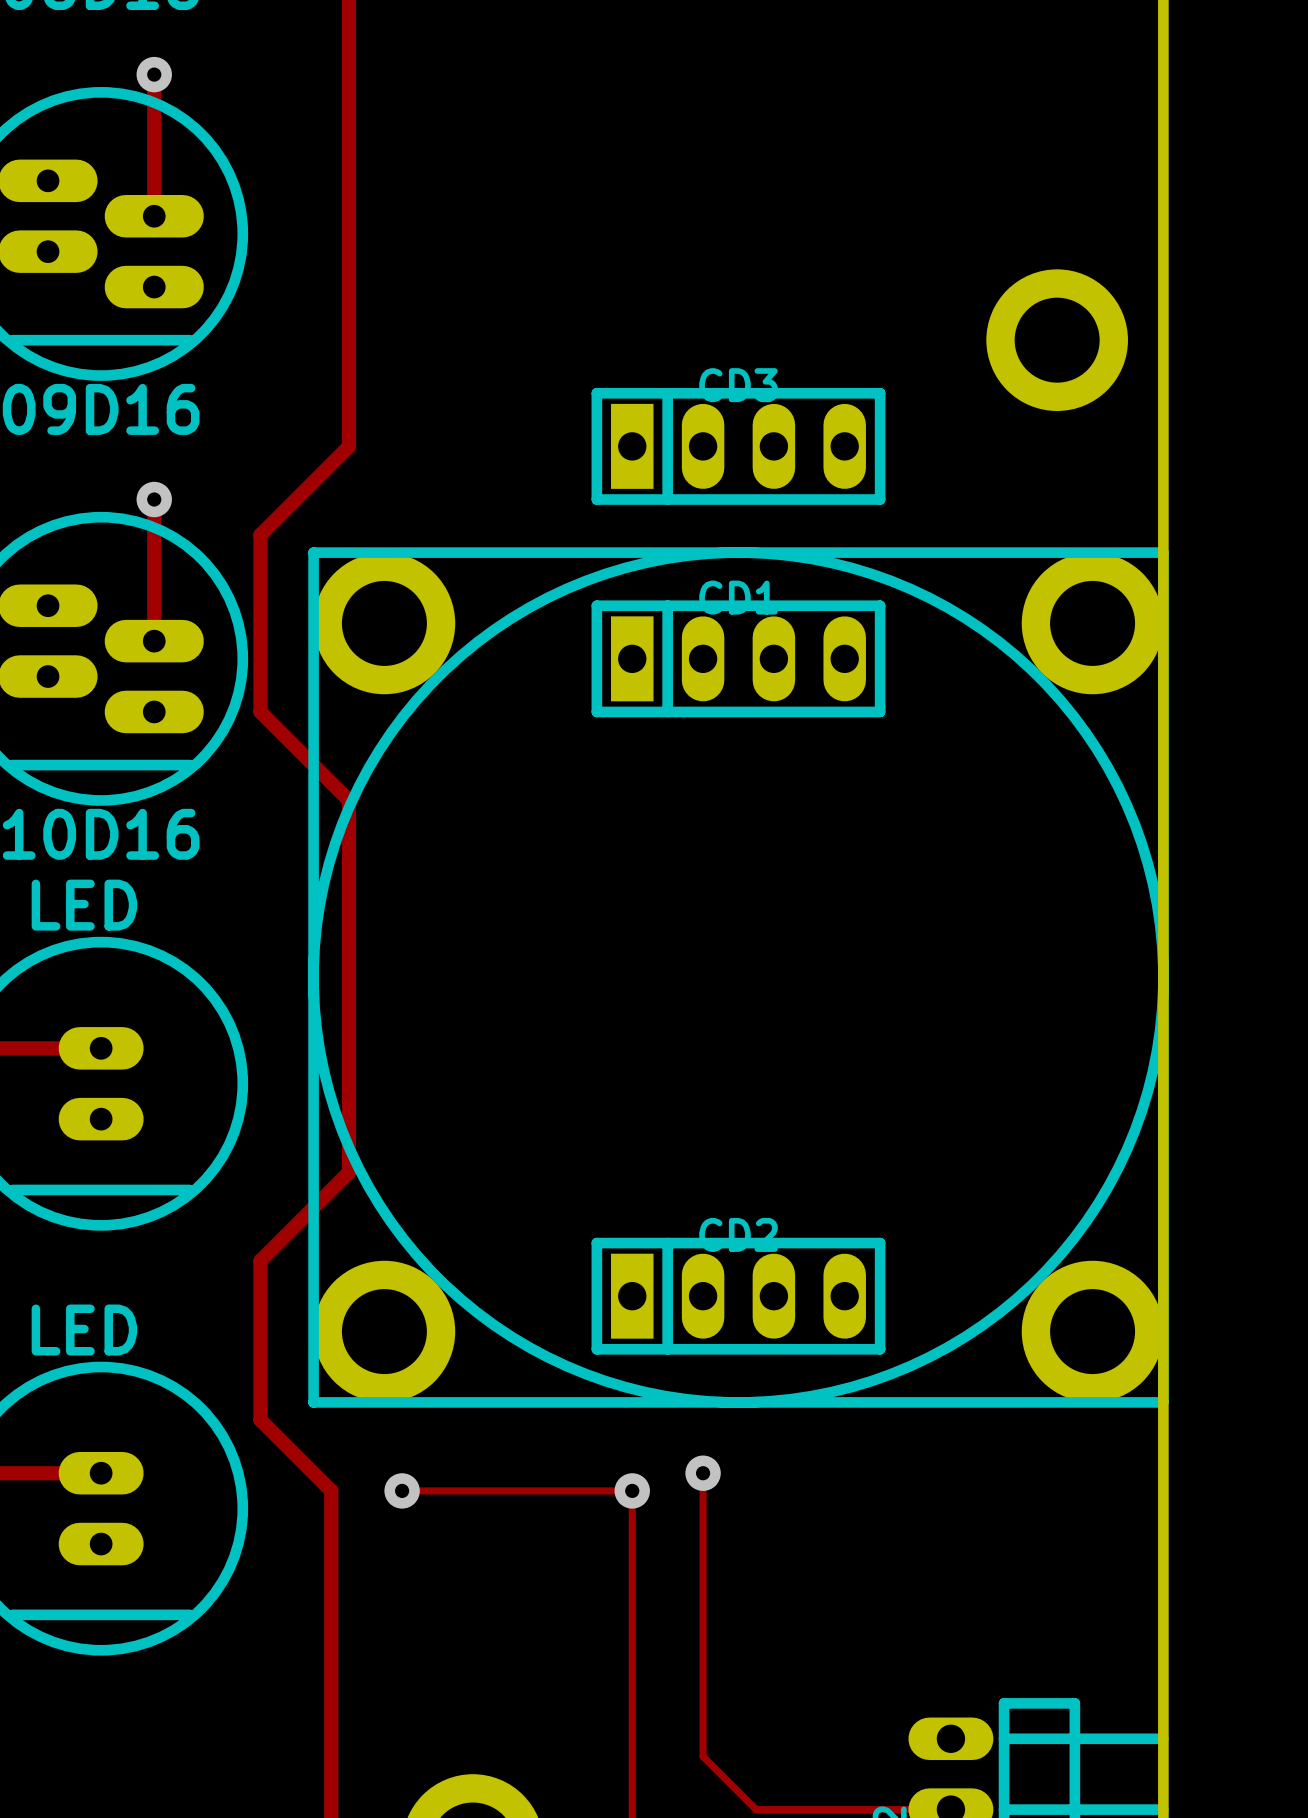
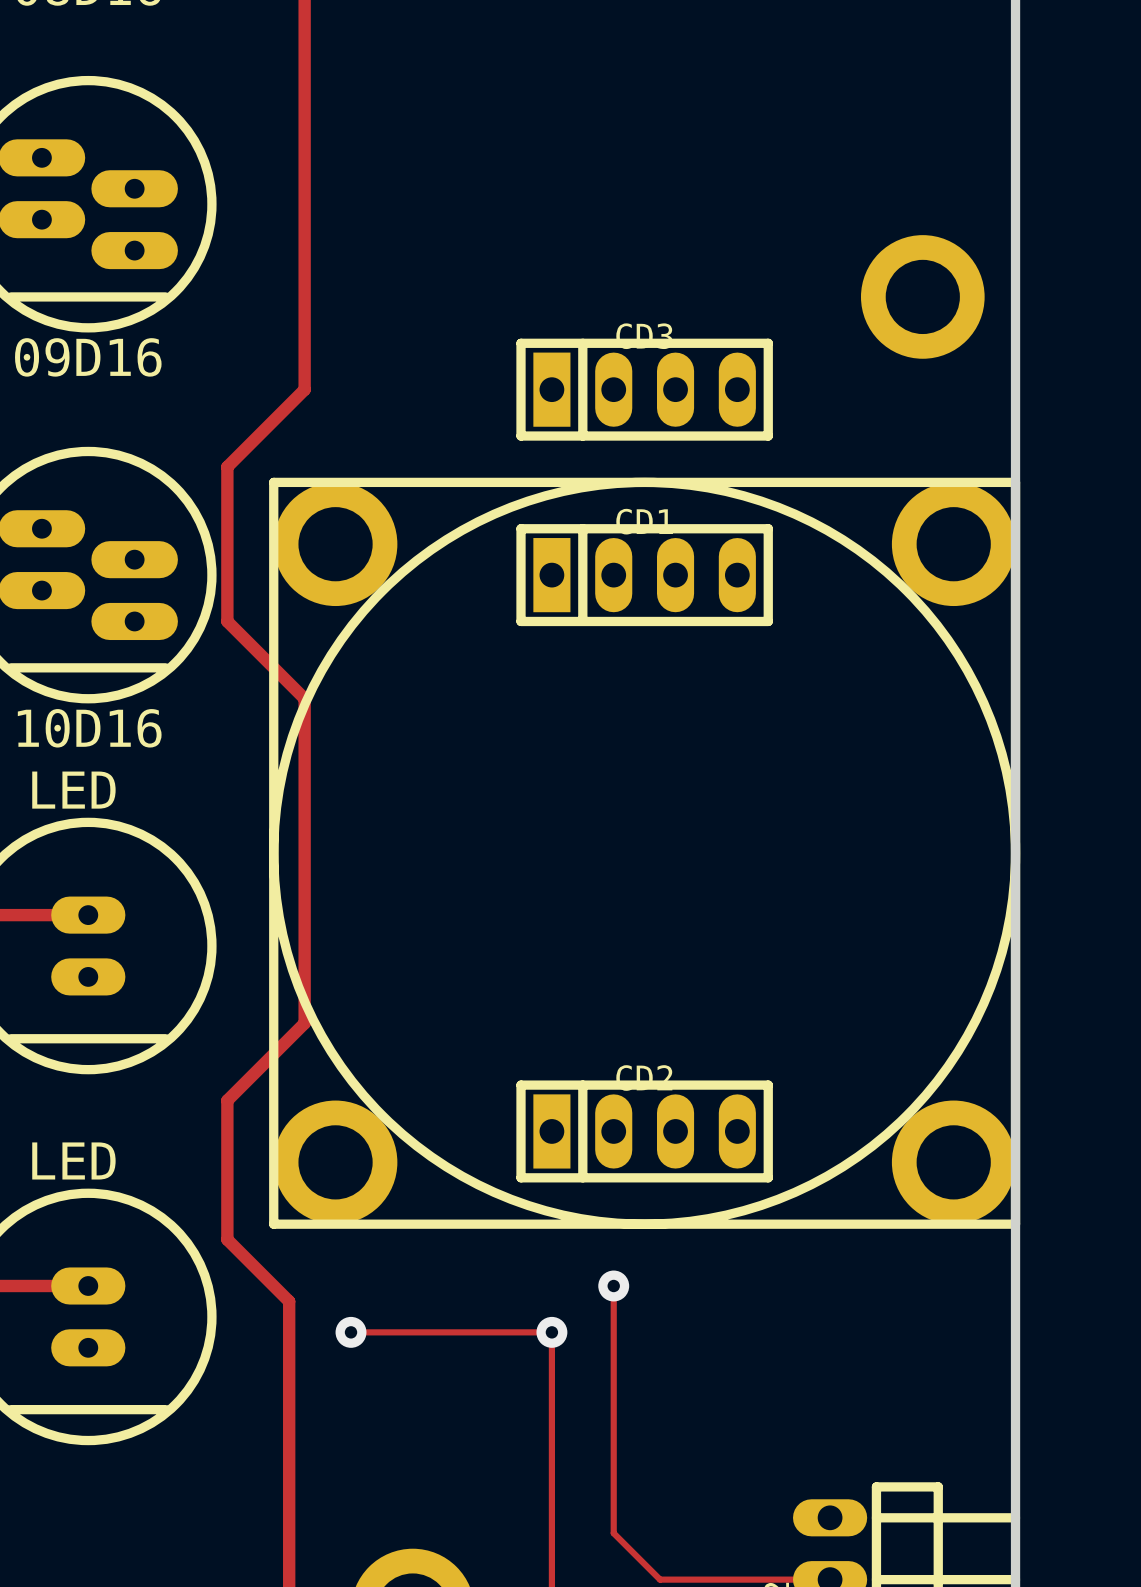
track: (154, 74) (154, 216) -> none
via: (154, 74) -> none
track: (154, 499) (154, 641) -> none
via: (154, 499) -> none
track: (402, 1490) (632, 1490) (632, 1526) -> (351, 1332) (551, 1332)
via position: (402, 1490) -> (351, 1332)
via position: (632, 1490) -> (551, 1332)

